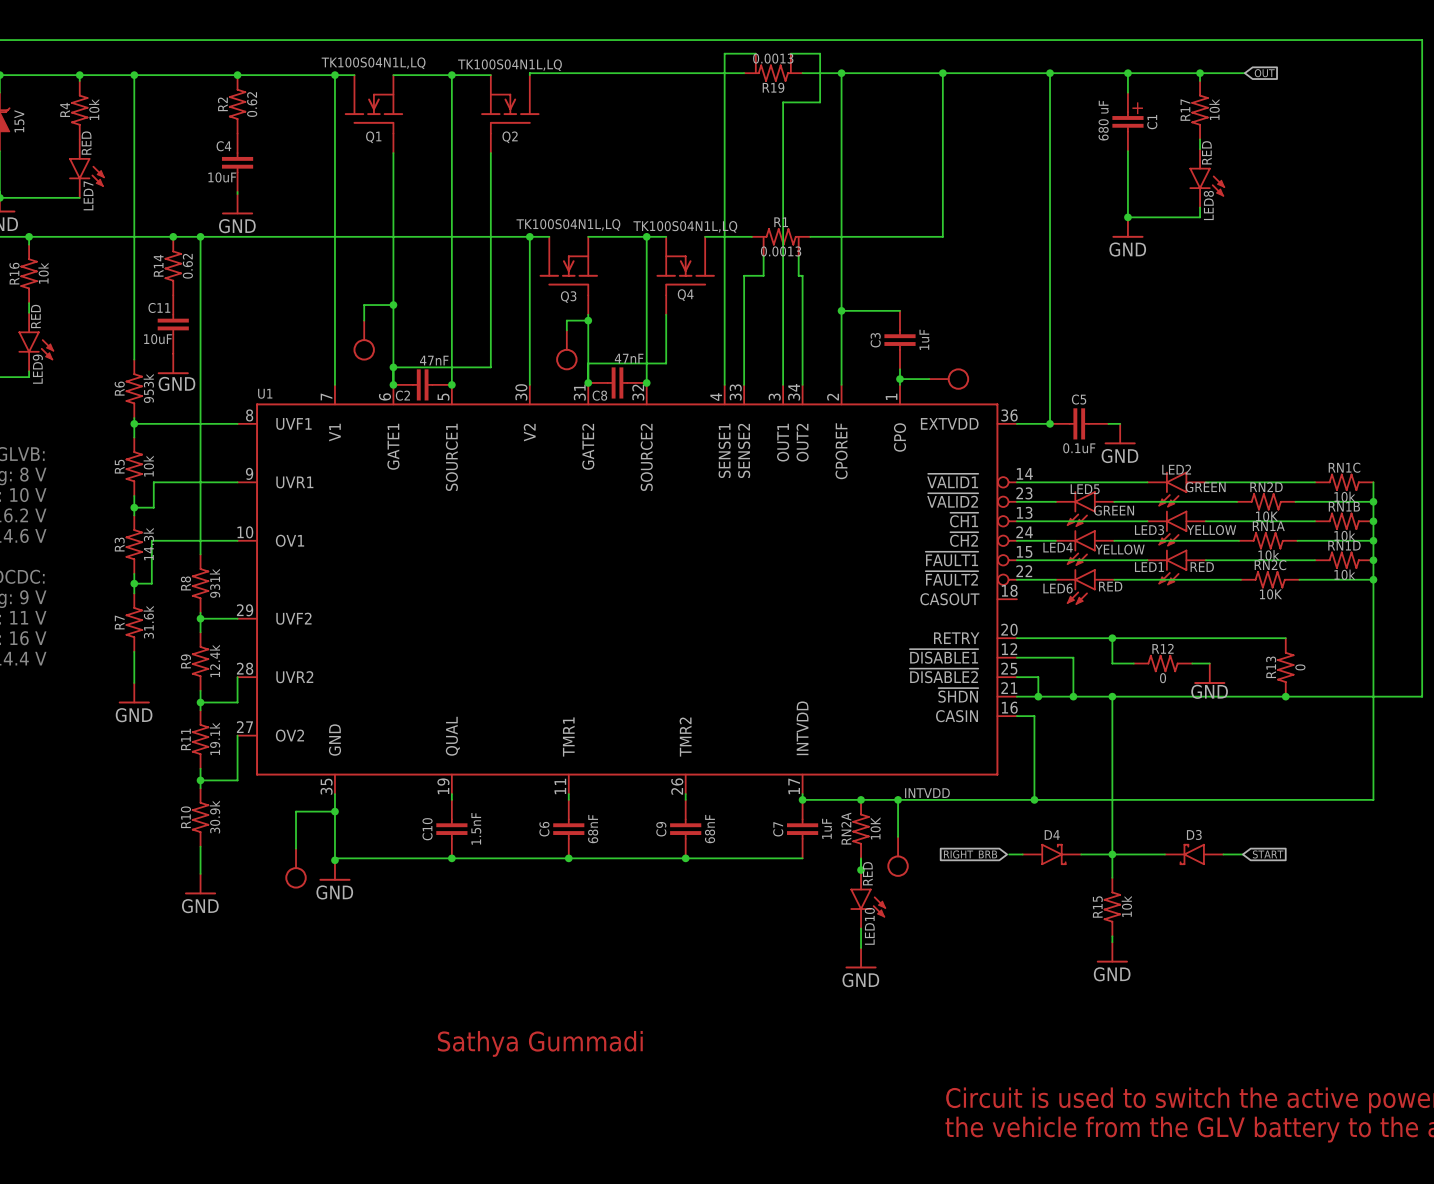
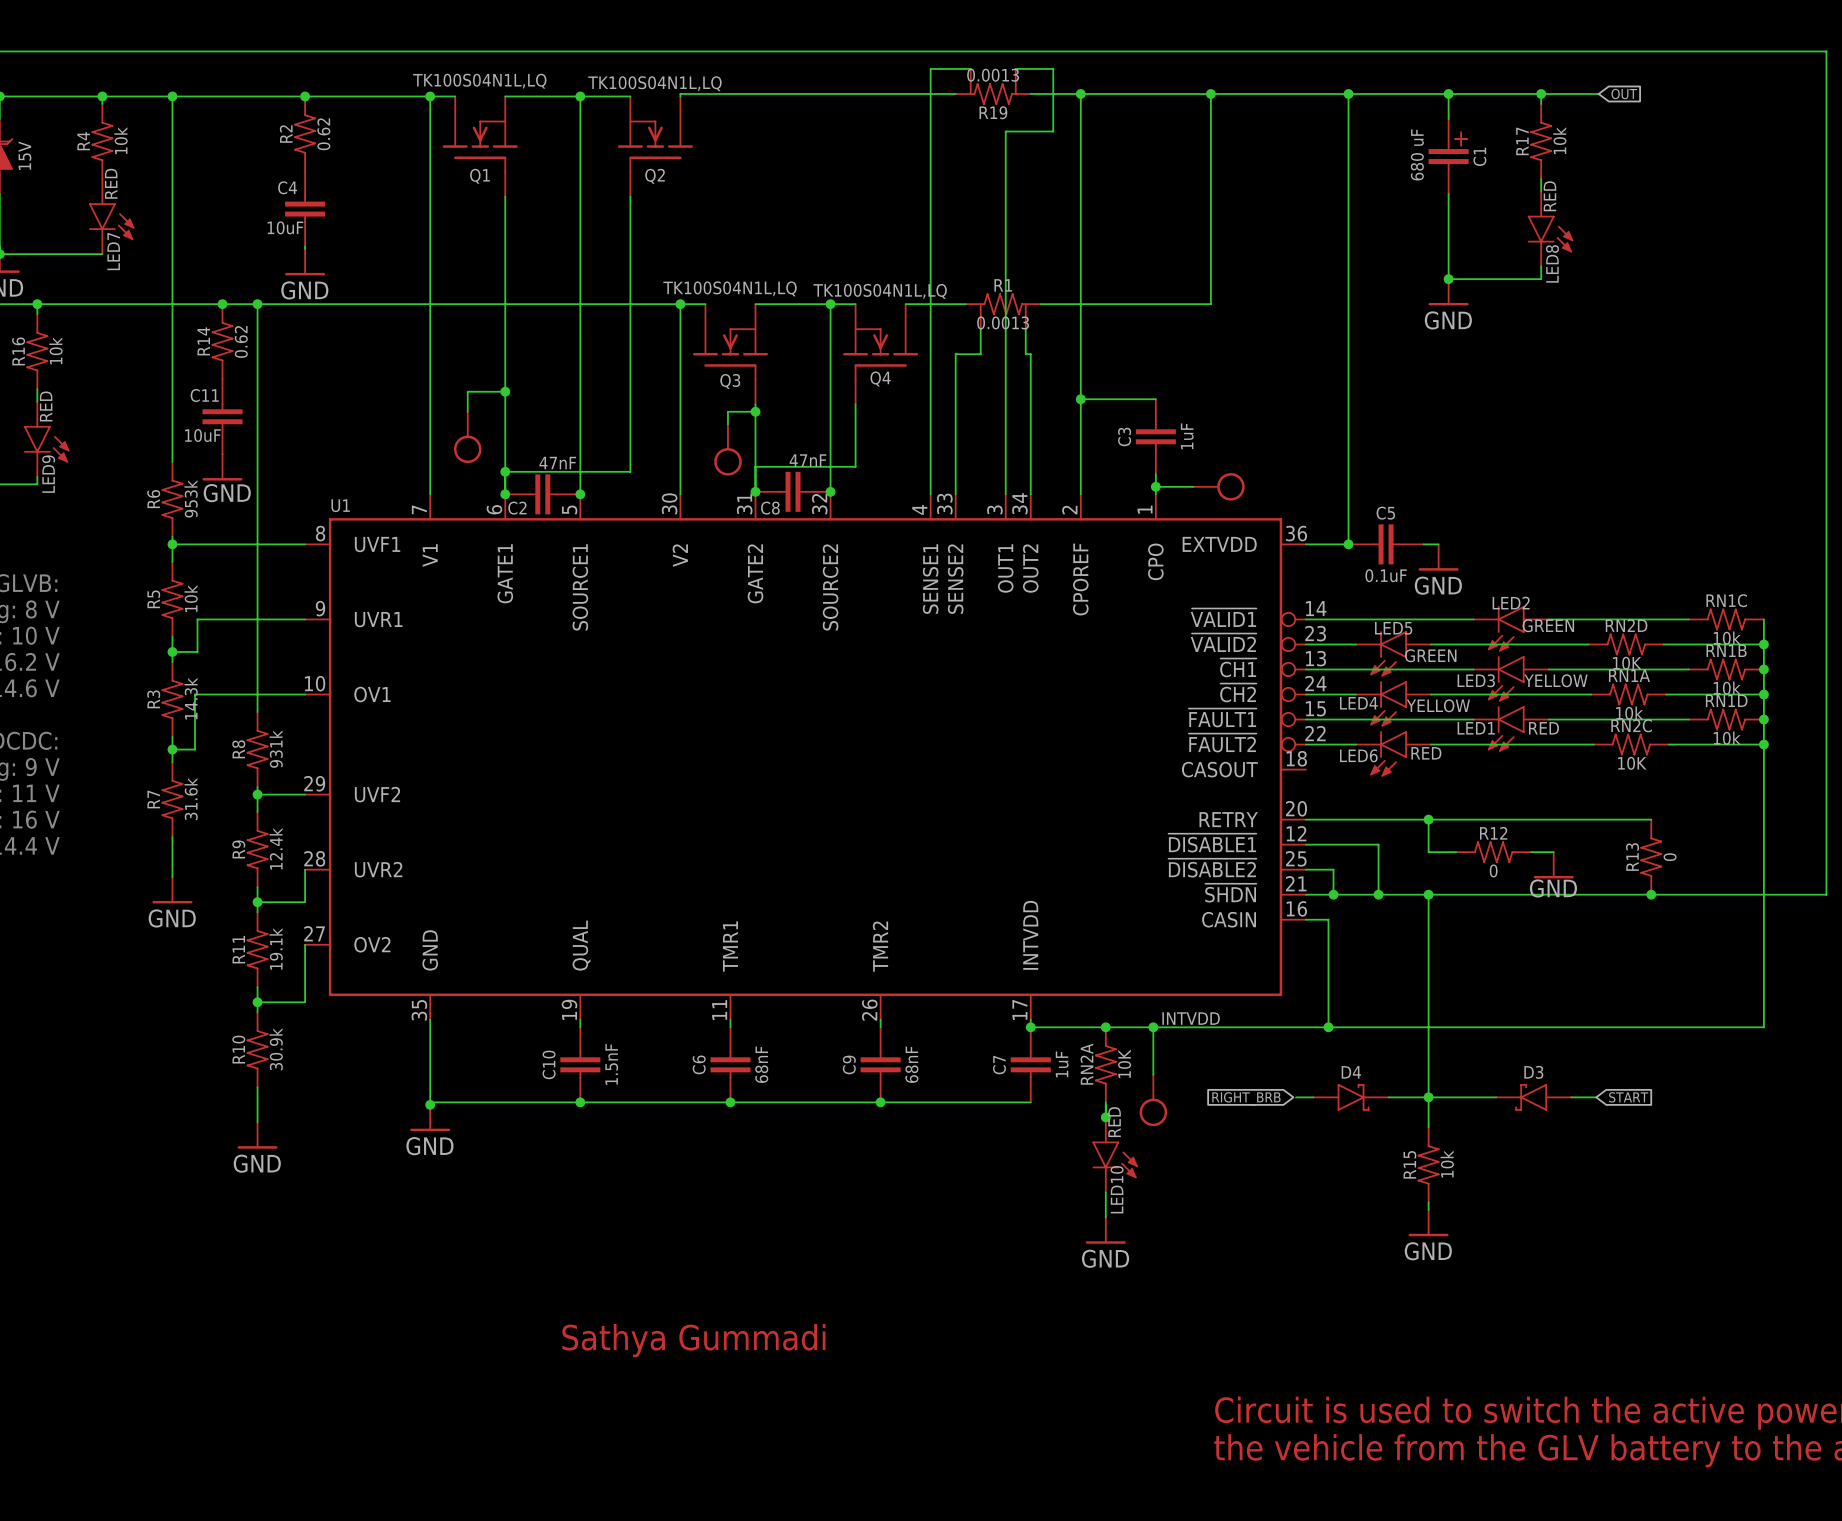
wire: (334, 811) (296, 811) (296, 848) -> none
junction: (334, 811) -> none
part: (296, 868) -> none

